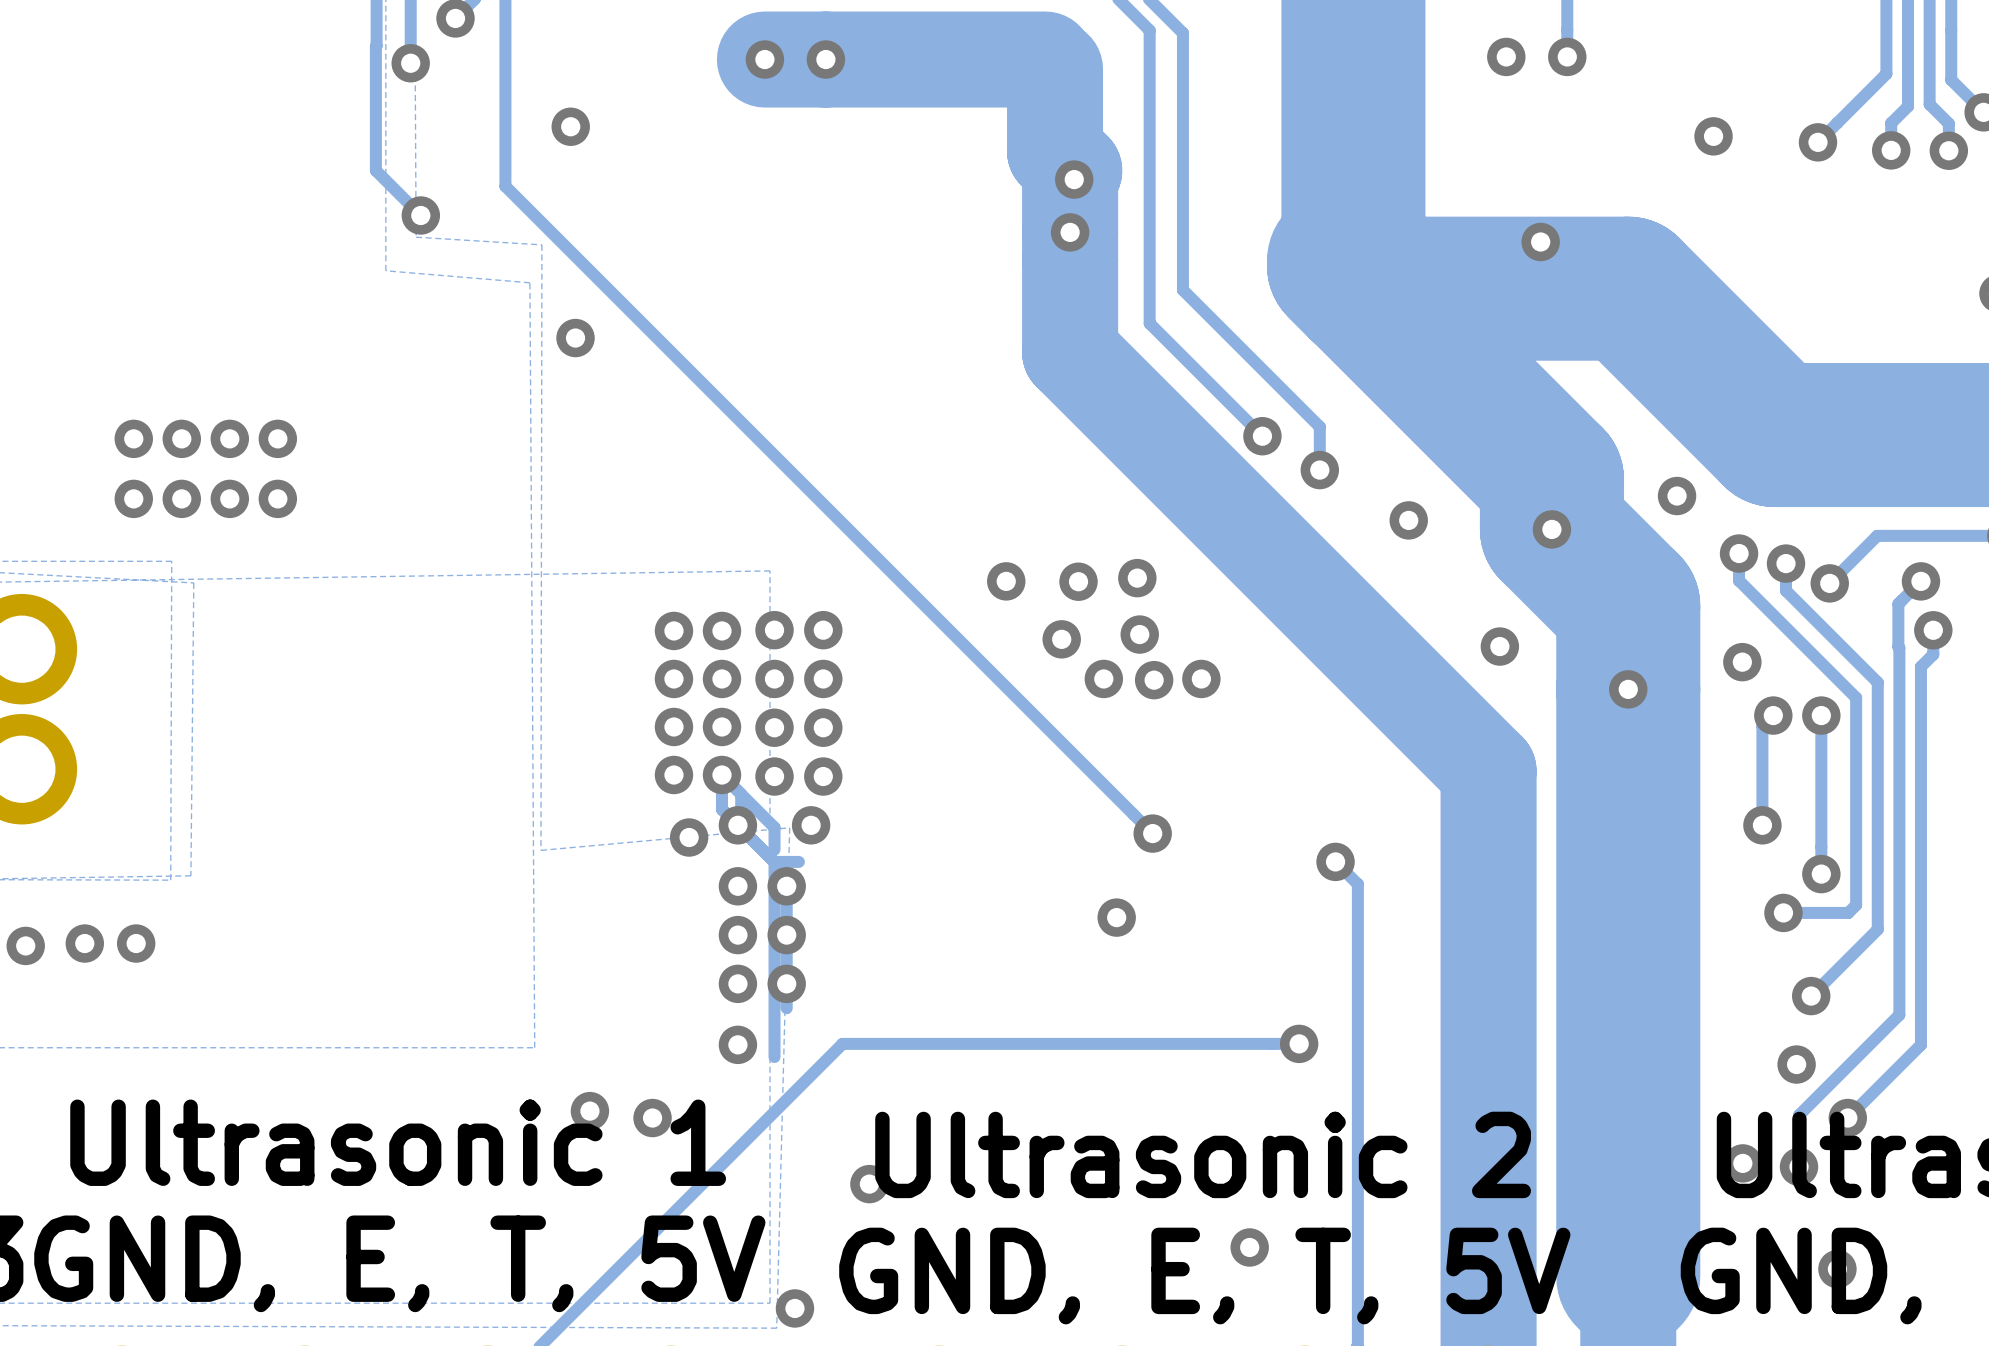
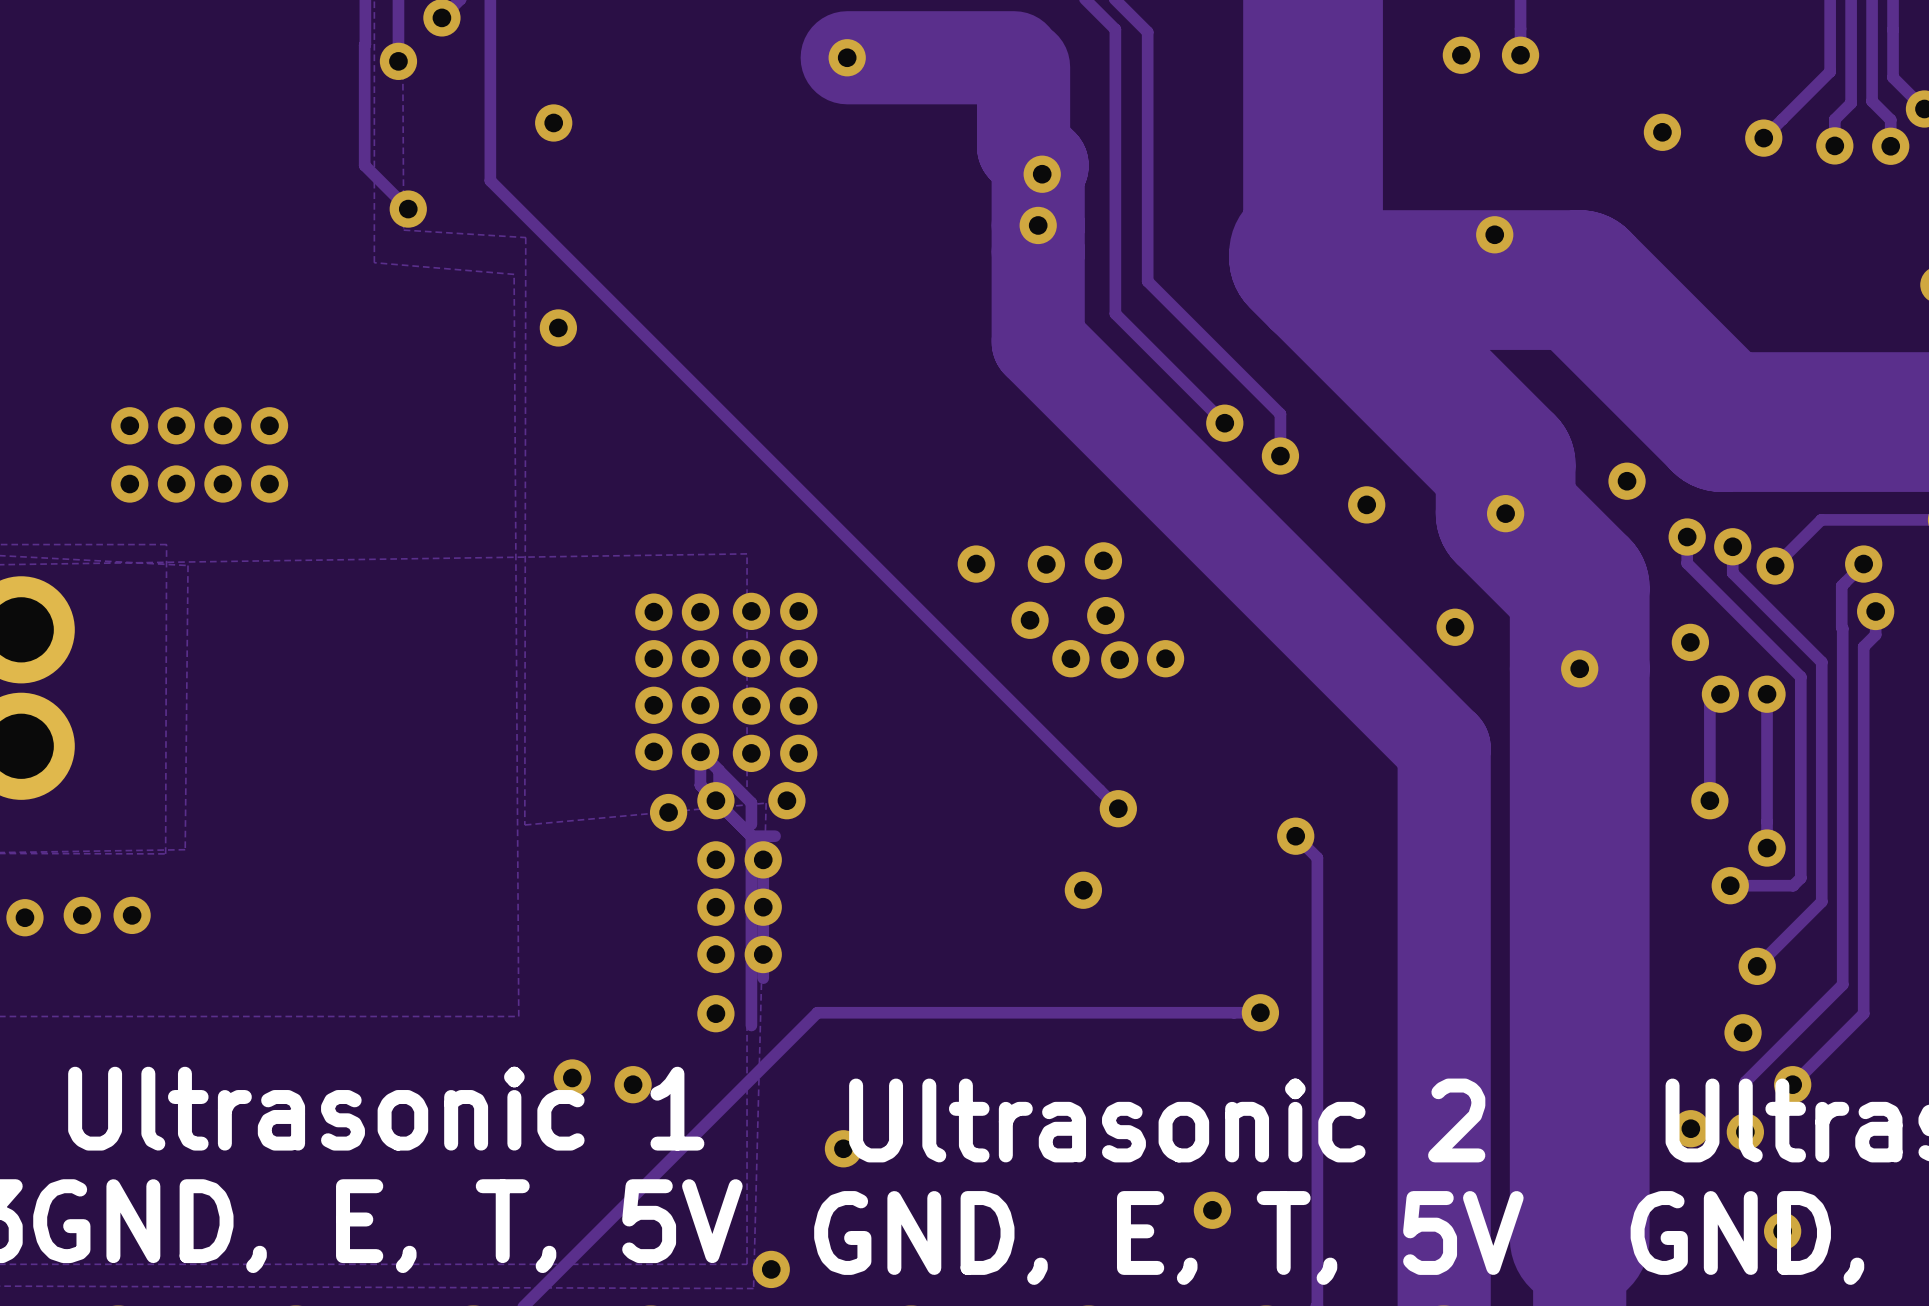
via: (764, 59) -> none
via position: (825, 59) -> (847, 57)
track: (873, 59) (764, 59) -> none

